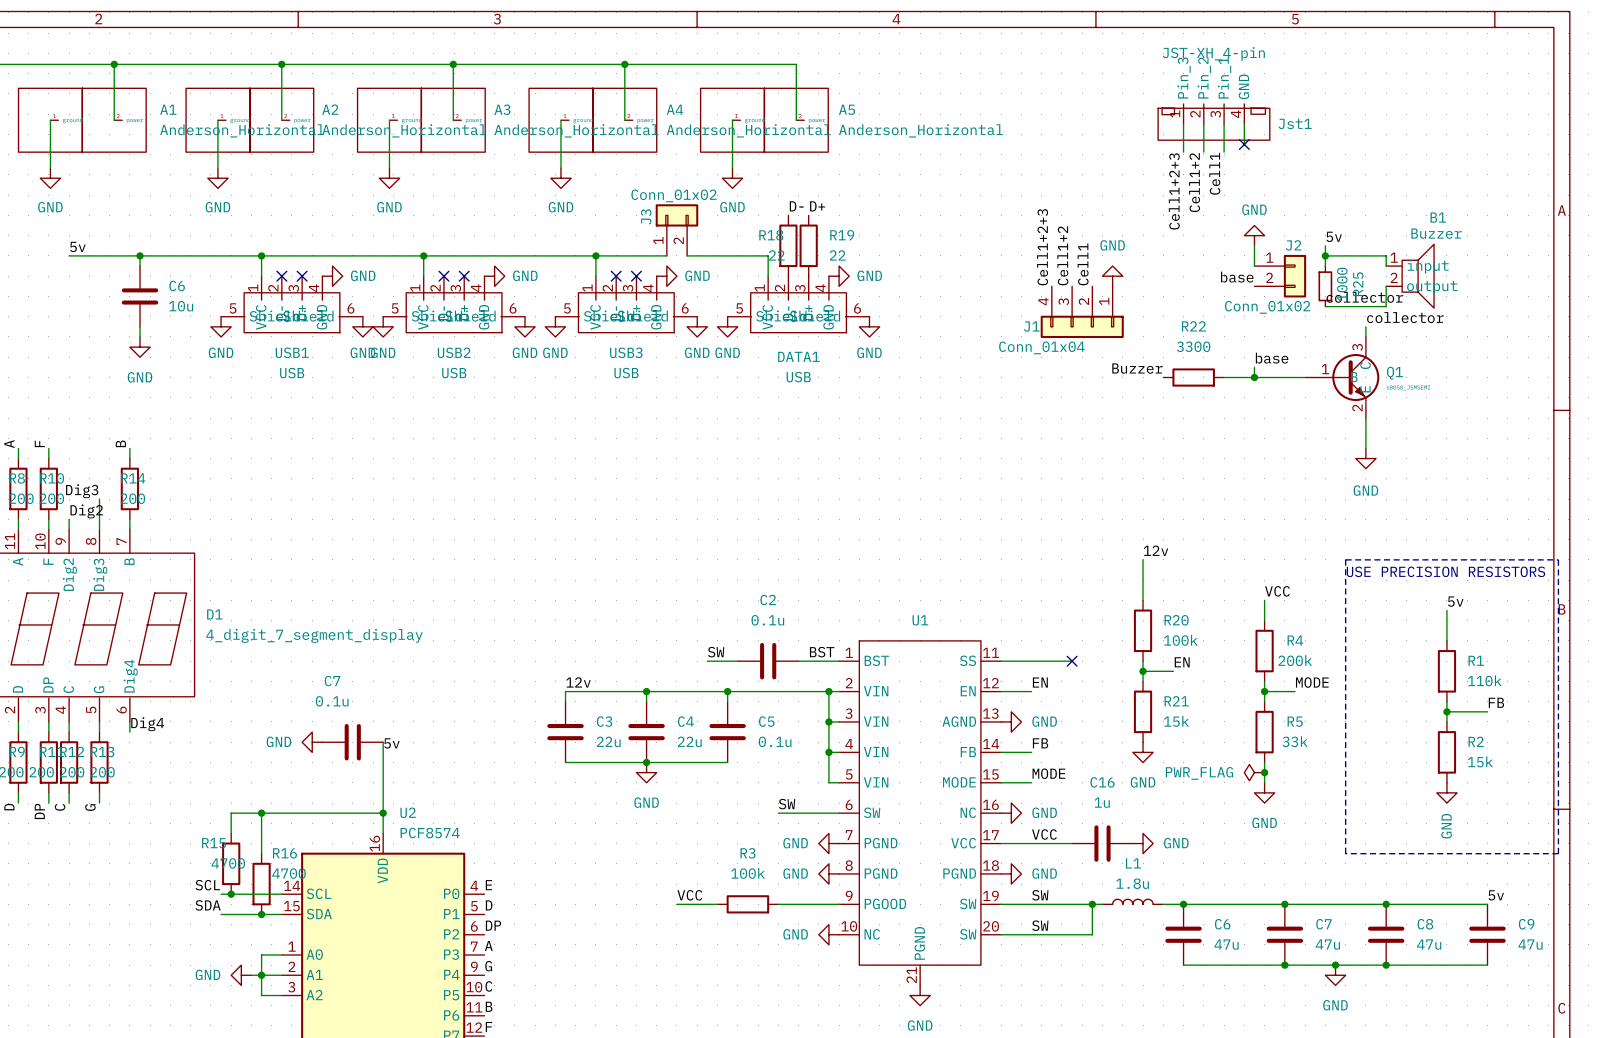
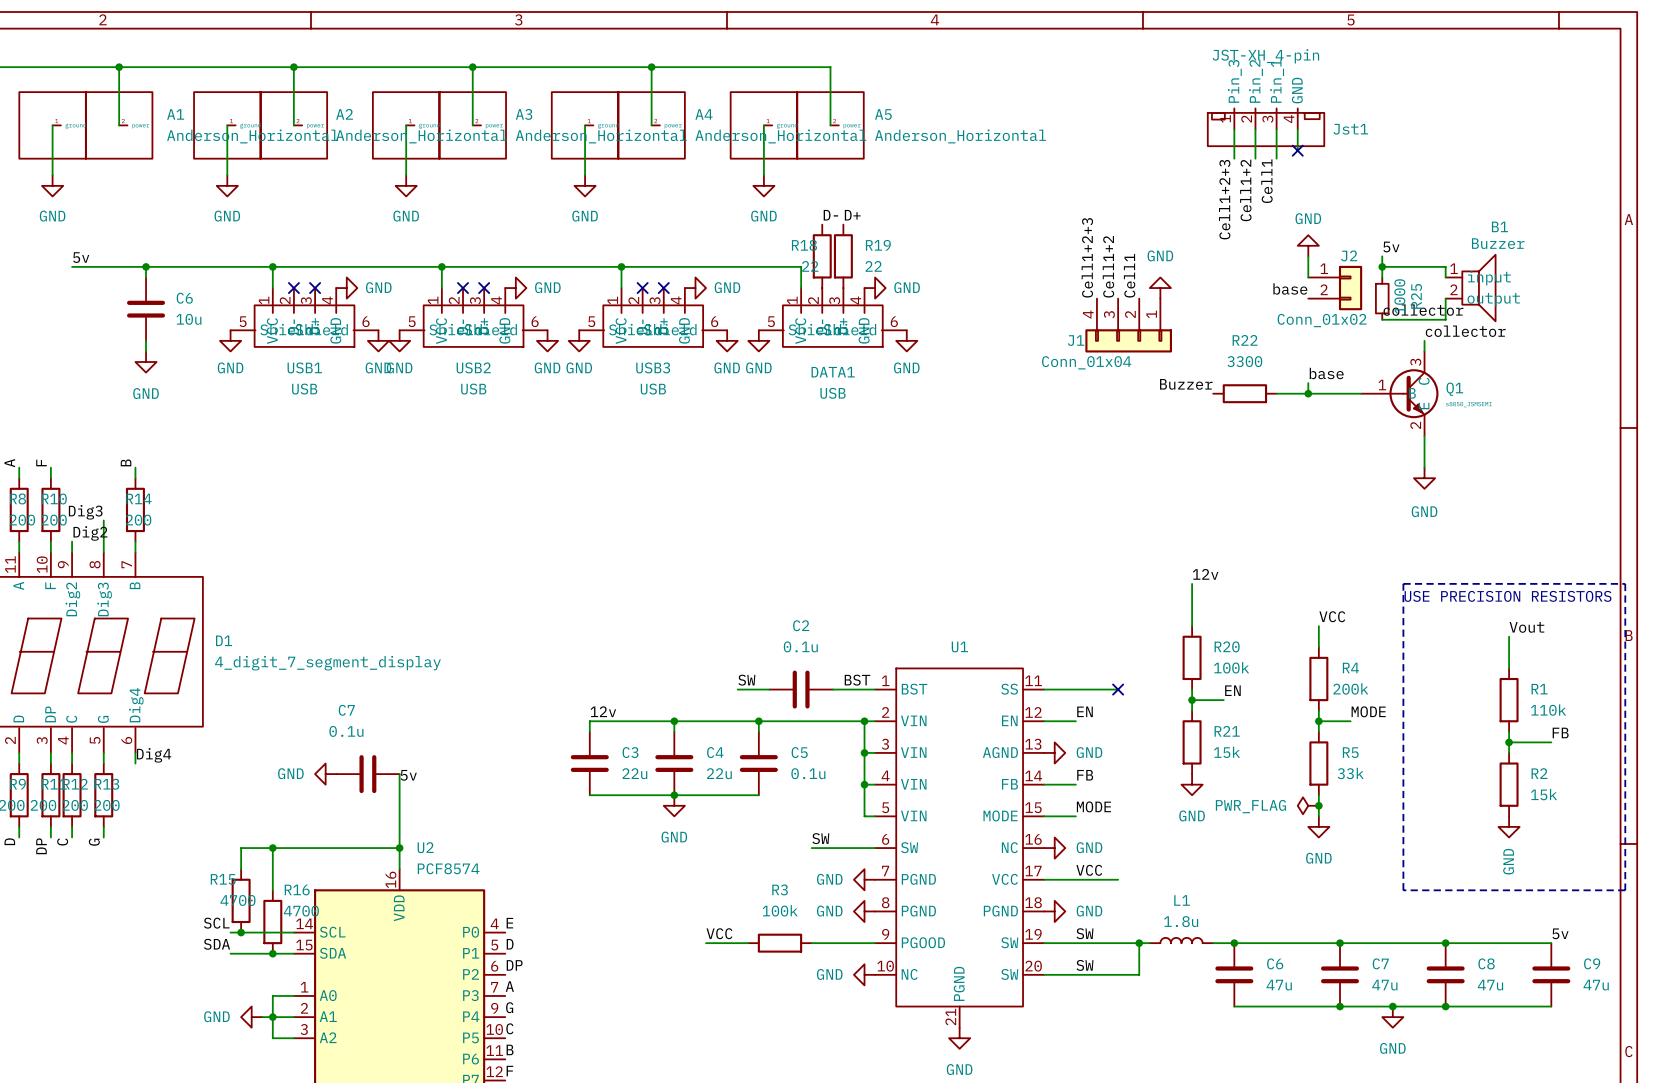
J3: Conn_01x02 (676, 230) -> none
wire: none -> (695, 266) (716, 266)
label: 5v (1455, 601) -> Vout (1526, 627)
C16: 1u (1102, 843) -> none
power symbol: GND (1143, 843) -> none

